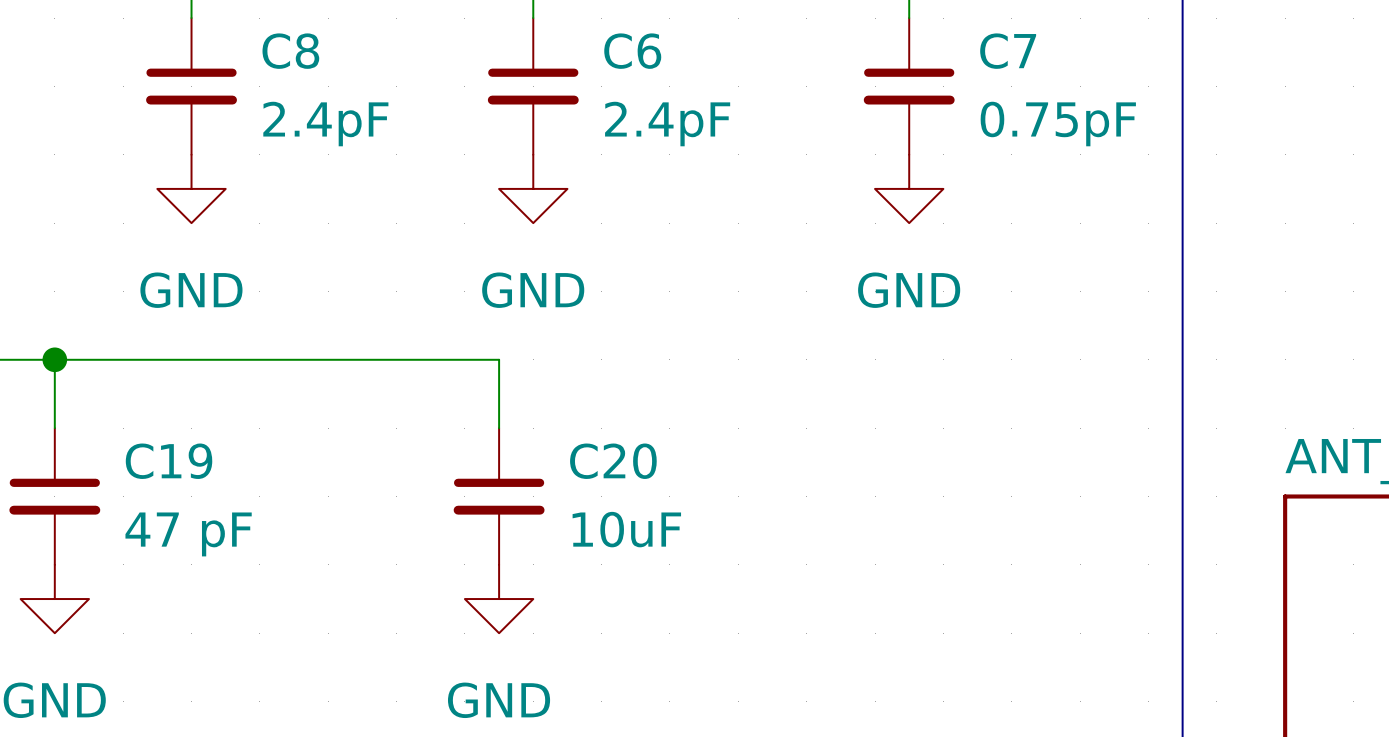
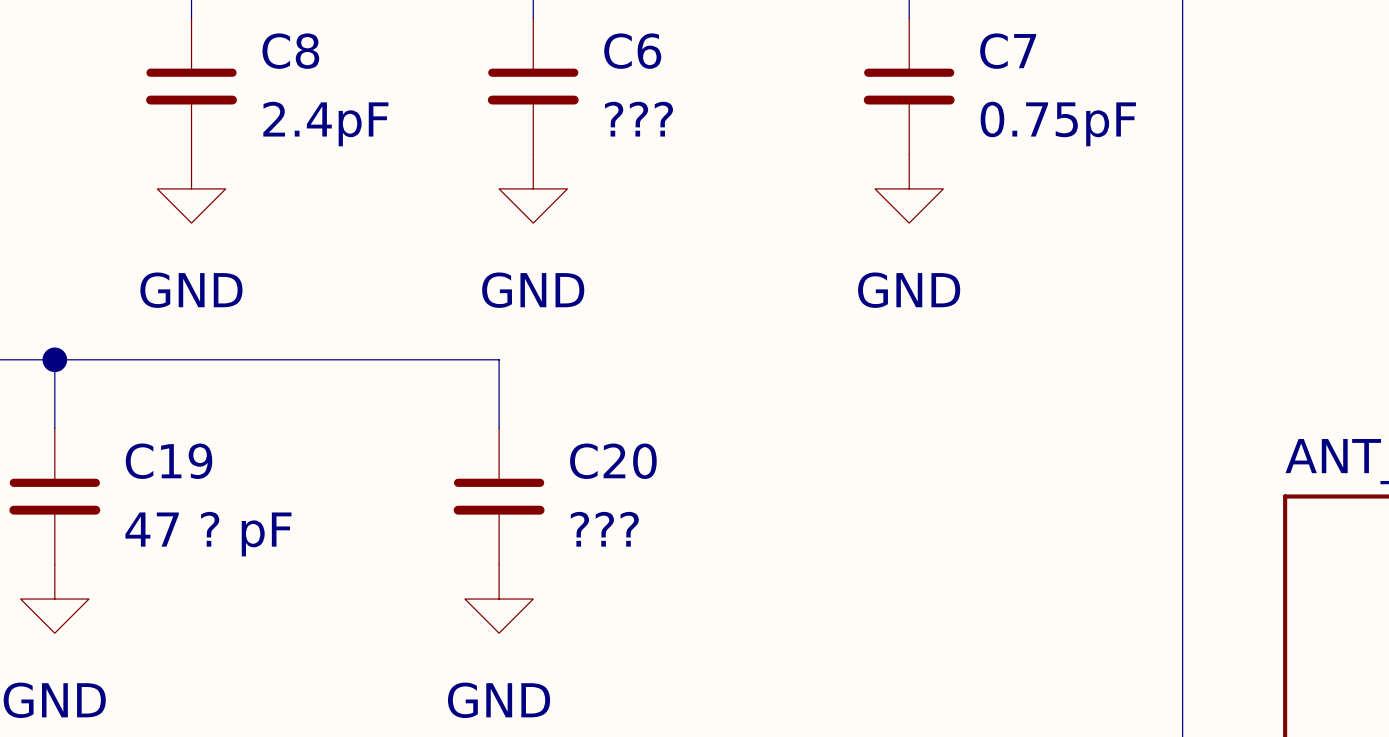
C6 value: 2.4pF (667, 124) -> ??? (638, 119)
C20 value: 10uF (626, 529) -> ??? (604, 529)
C19 value: 47 pF (188, 534) -> 47 ? pF (208, 534)

